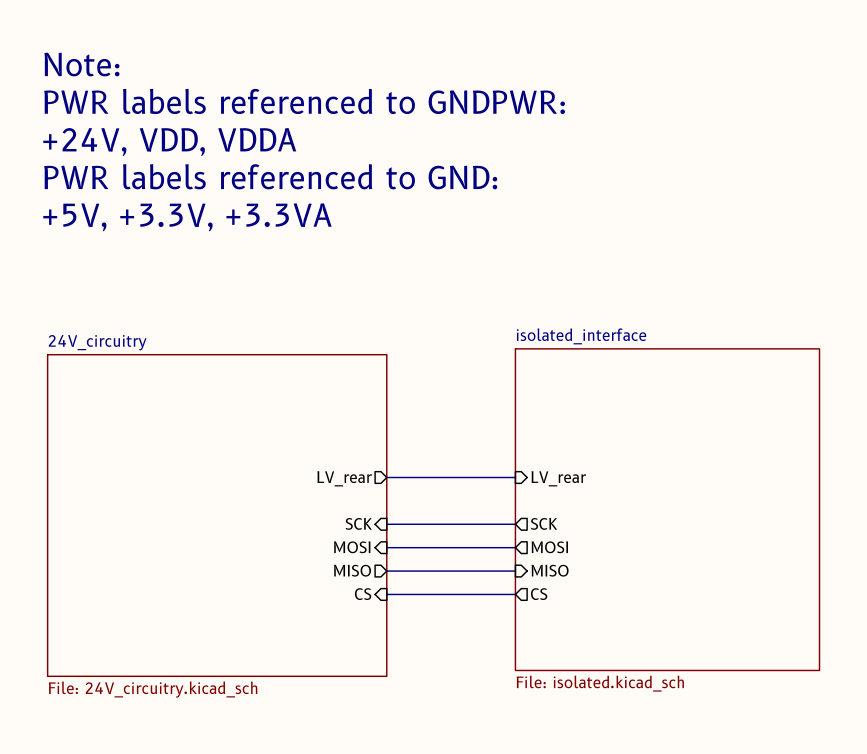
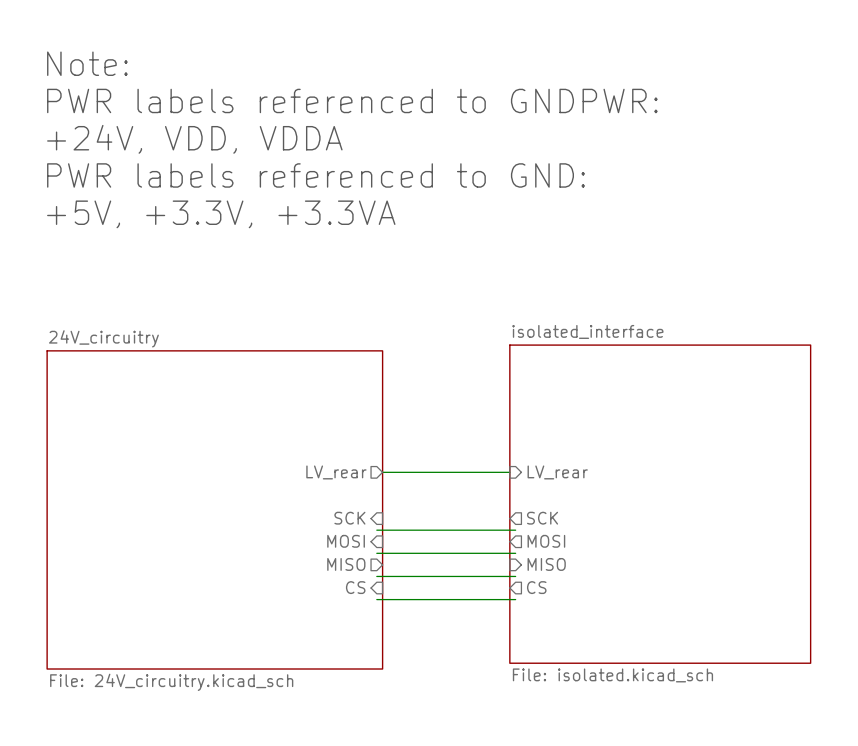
wire: (386, 524) (515, 524) -> none
wire: none -> (376, 530) (515, 530)
wire: (386, 547) (515, 547) -> none
wire: none -> (376, 553) (515, 553)
wire: (386, 571) (515, 571) -> none
wire: none -> (376, 576) (515, 576)
wire: (386, 594) (515, 594) -> none
wire: none -> (376, 599) (515, 599)

